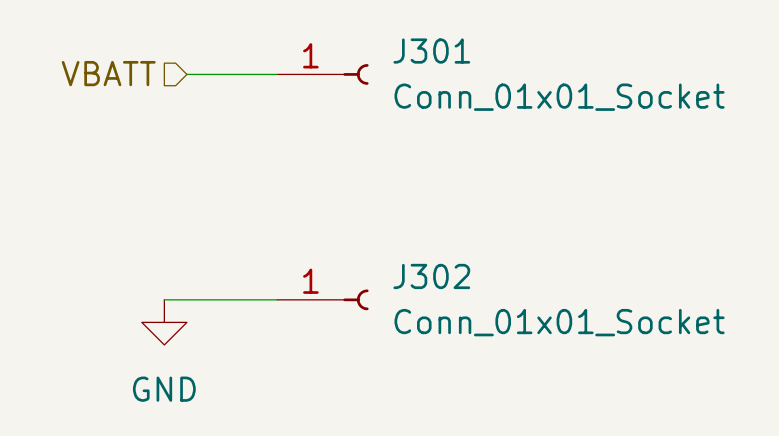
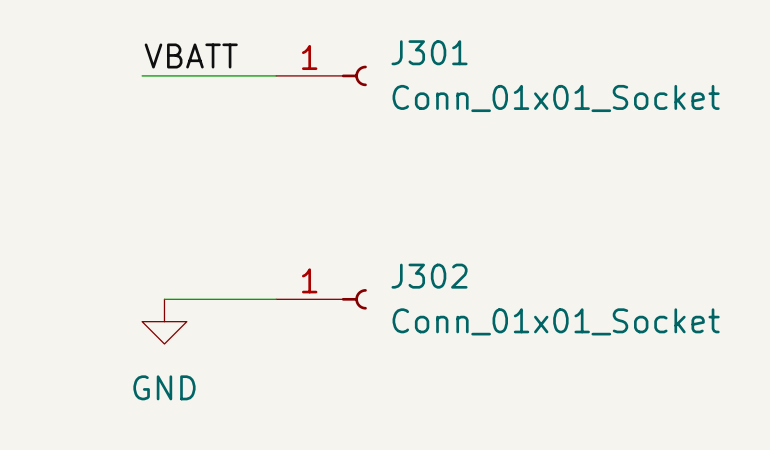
label: none -> VBATT (191, 55)
hierarchical label: VBATT (108, 73) -> none
wire: none -> (142, 75) (186, 75)

